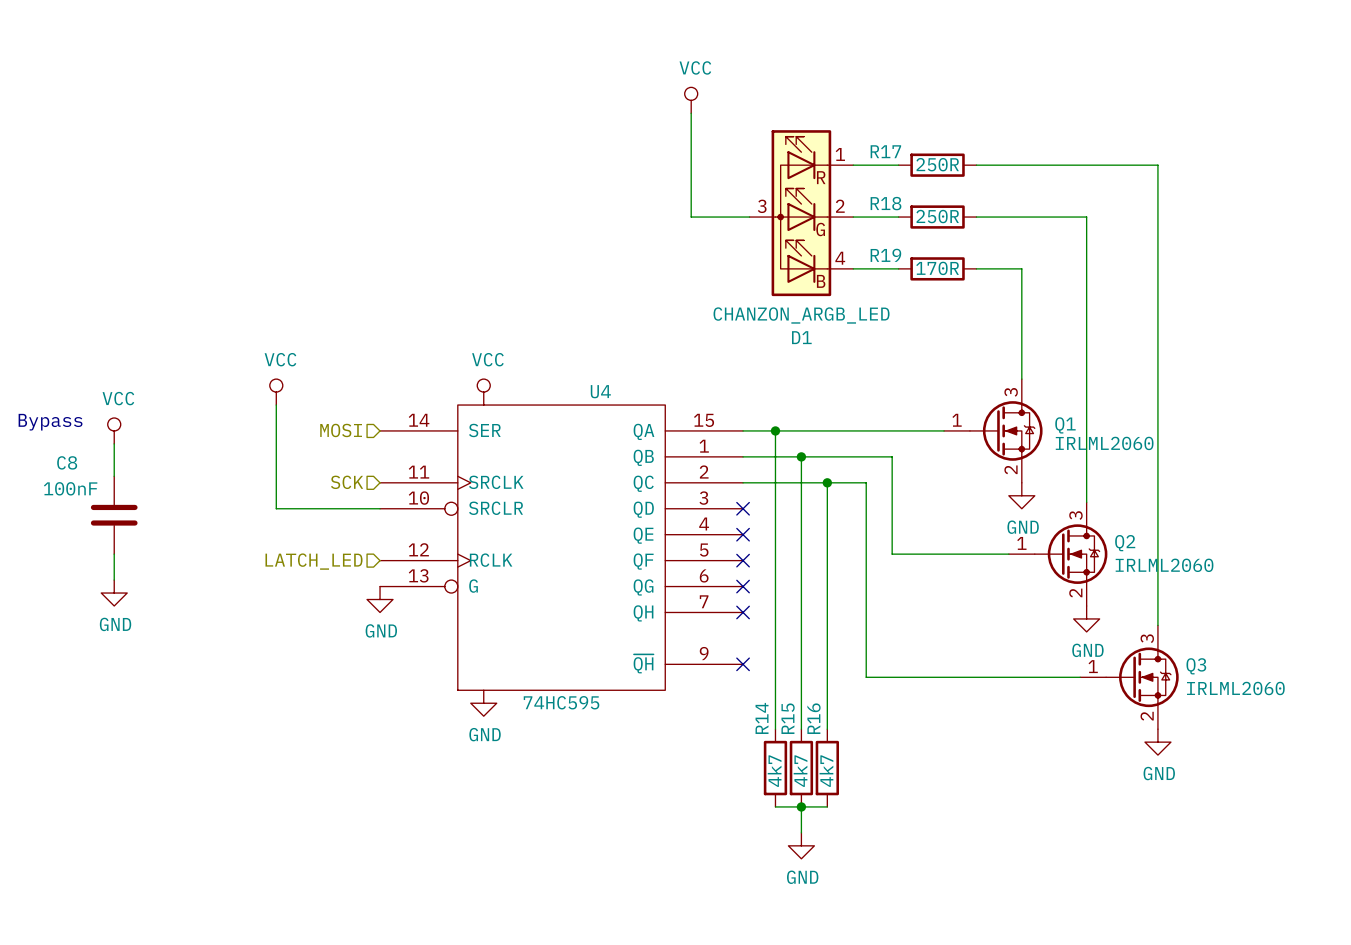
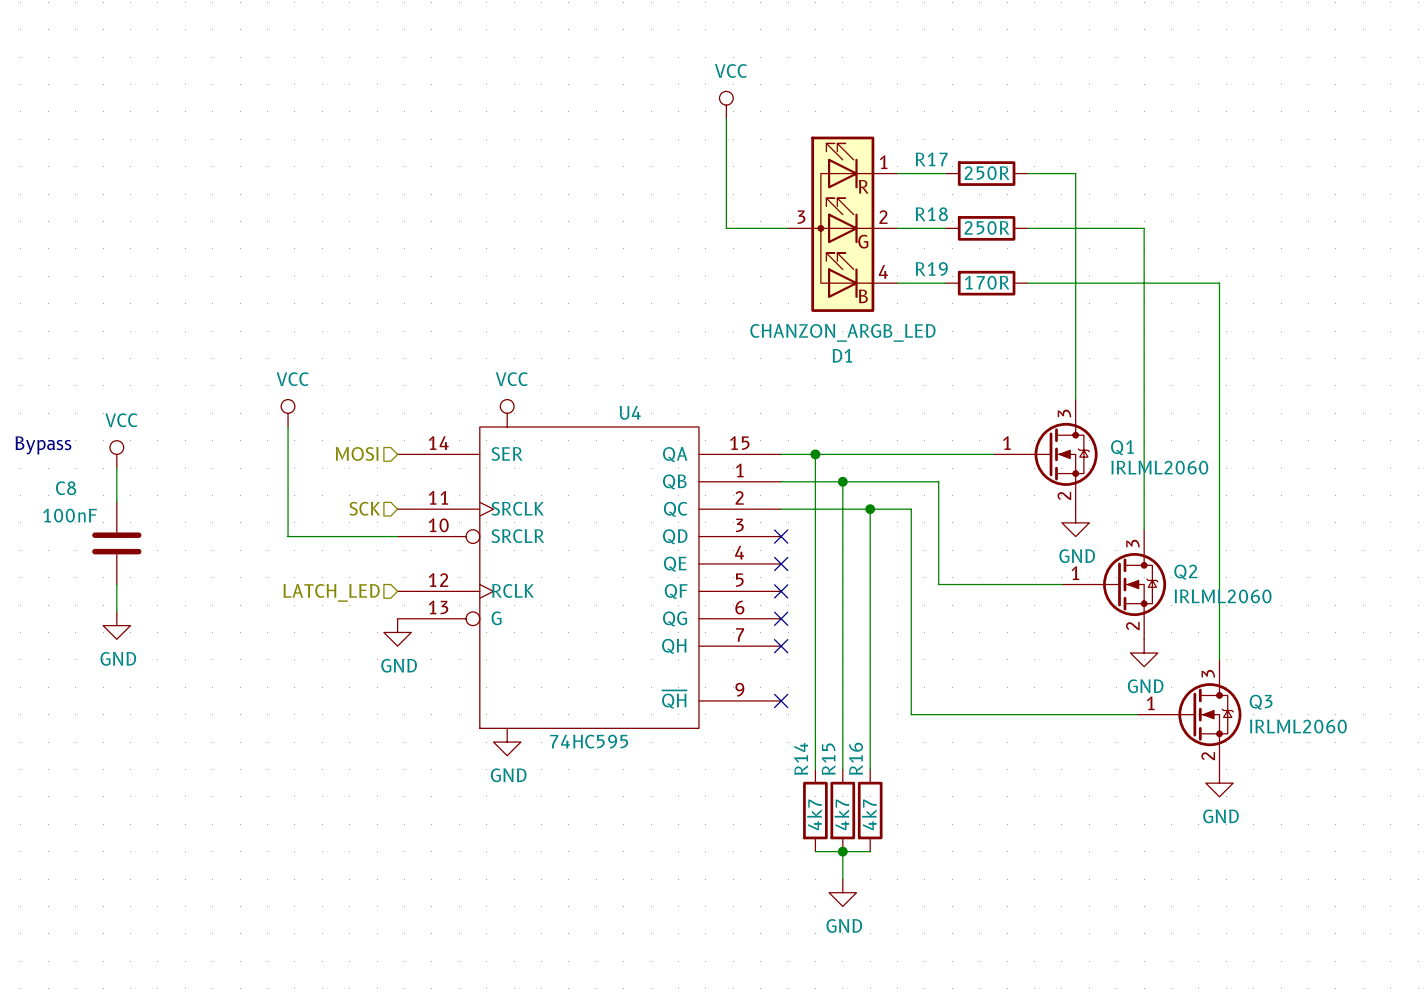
wire: (1021, 165) (1157, 165) (1157, 268) -> (1075, 173) (1075, 283) (1219, 283)

